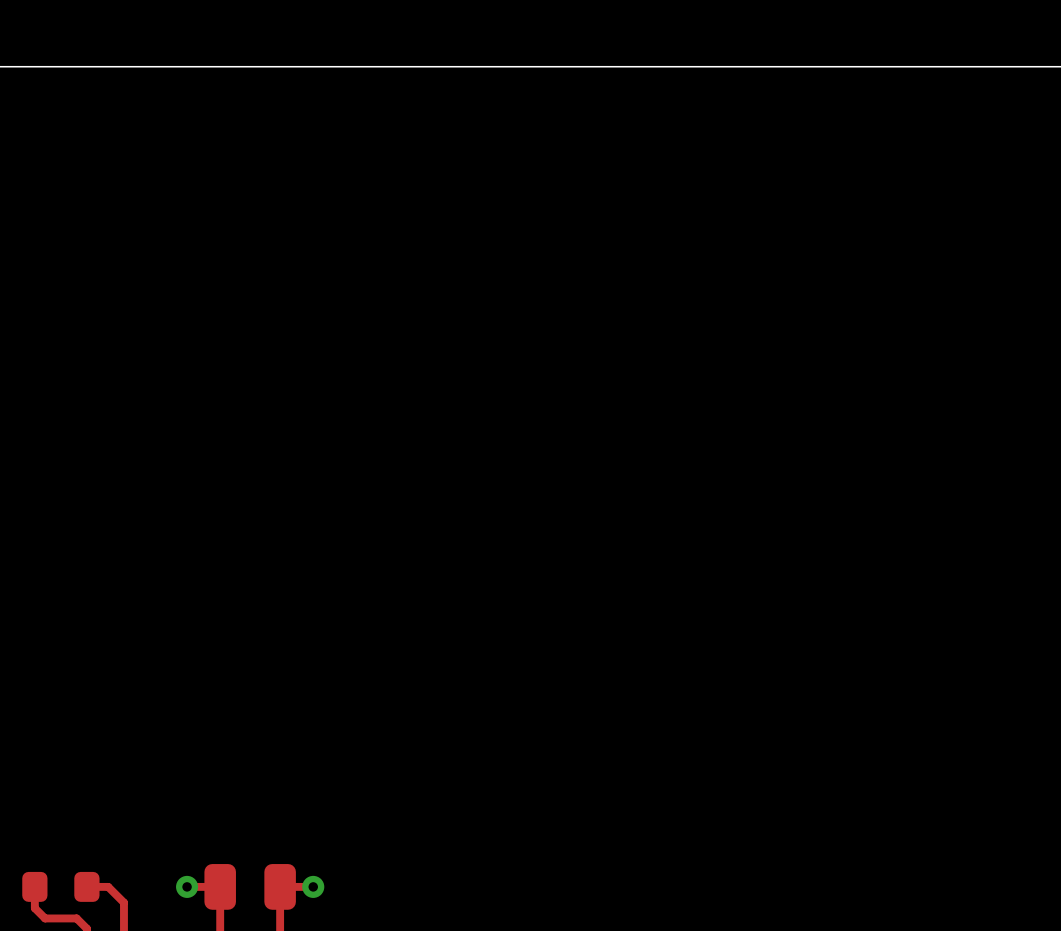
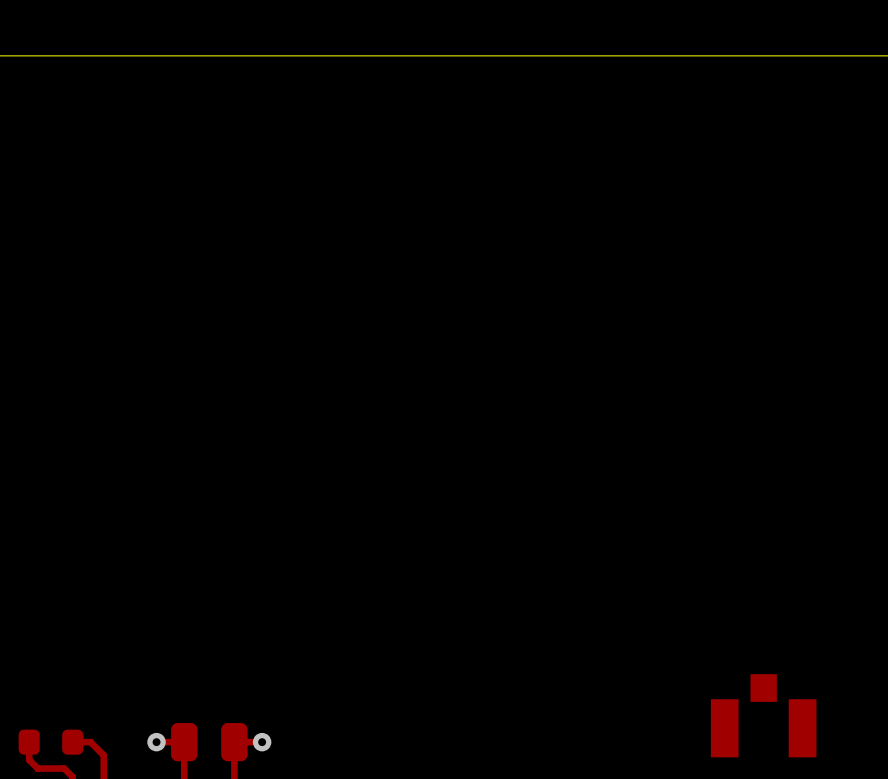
part: none -> (763, 715)

